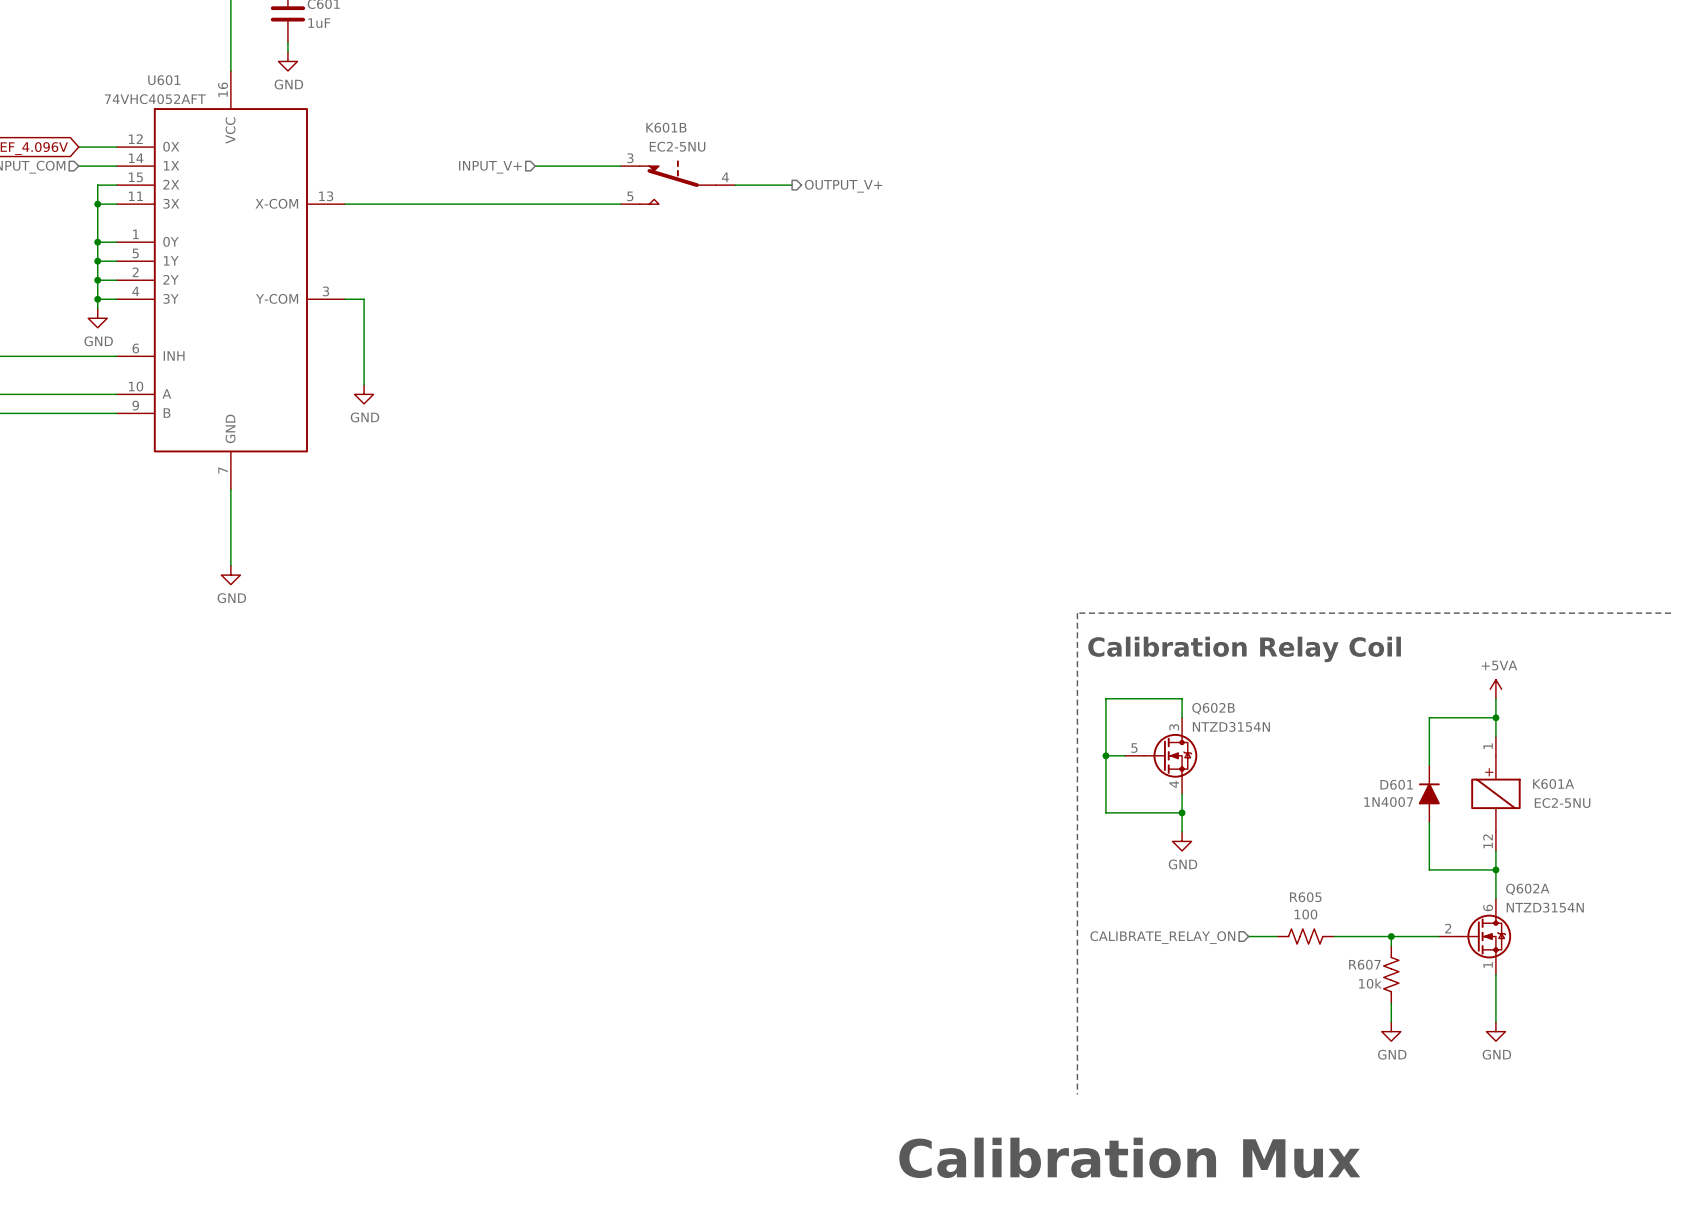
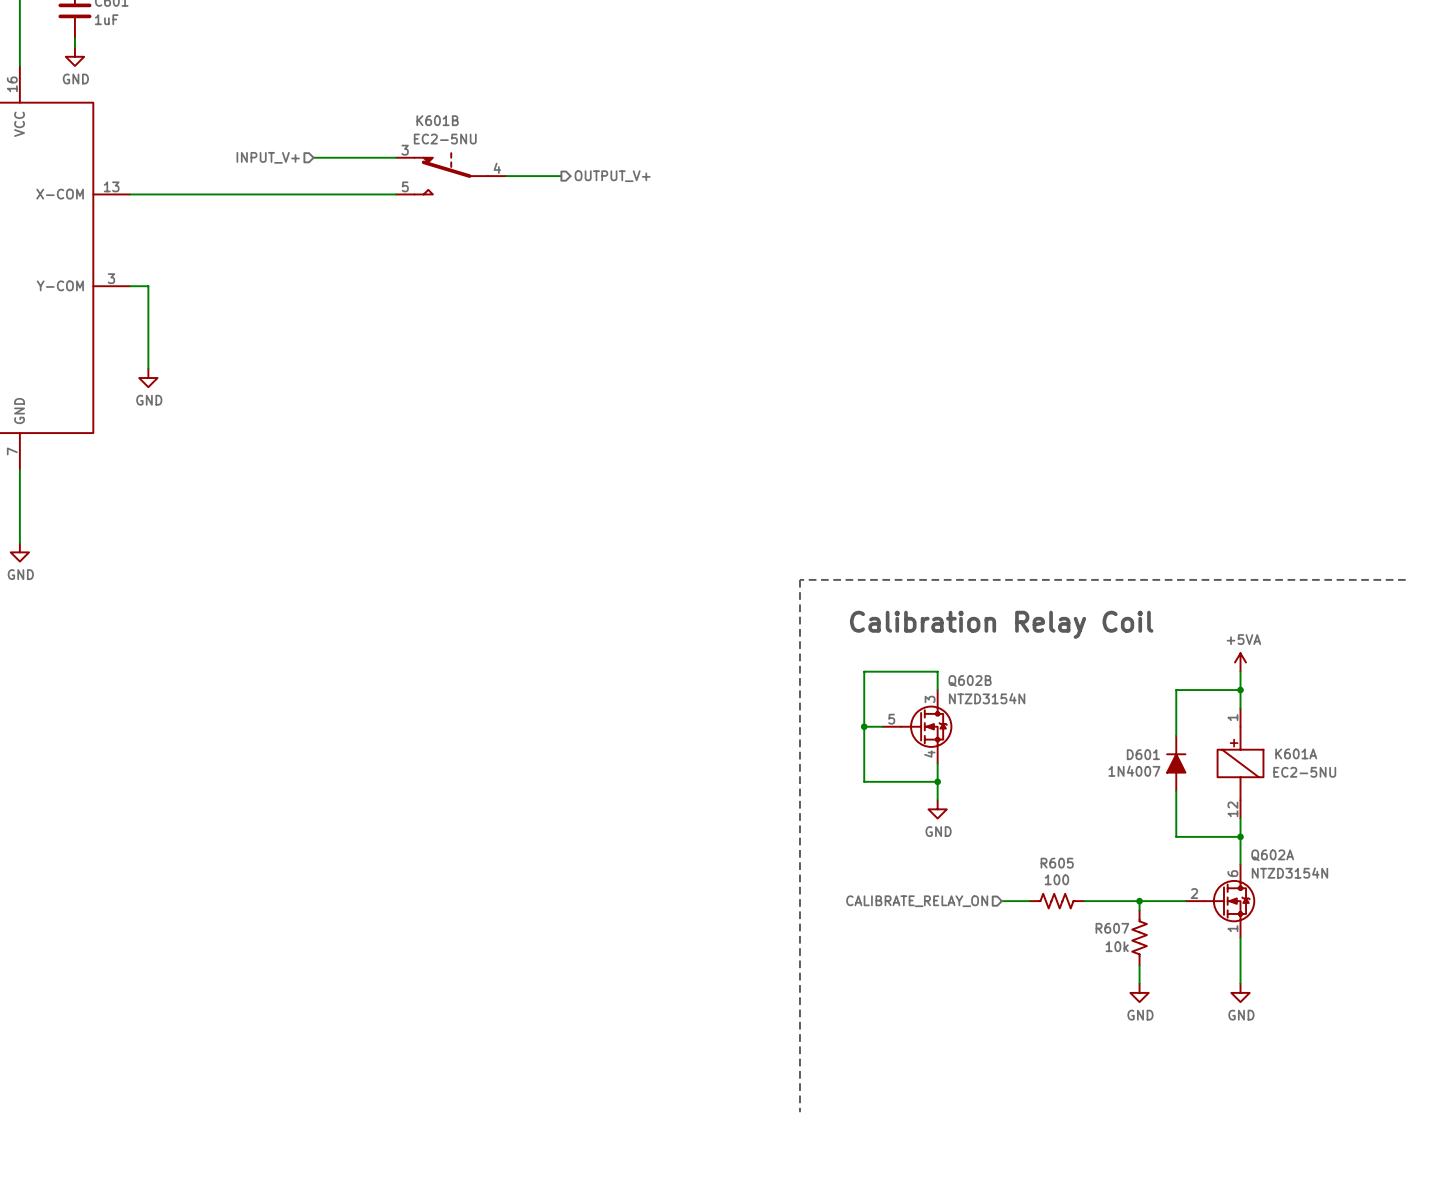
line: none -> (1405, 579) (799, 579) (799, 1112)
line: (1670, 613) (1077, 613) (1077, 1094) -> none
text: Calibration Mux (1129, 1157) -> none

